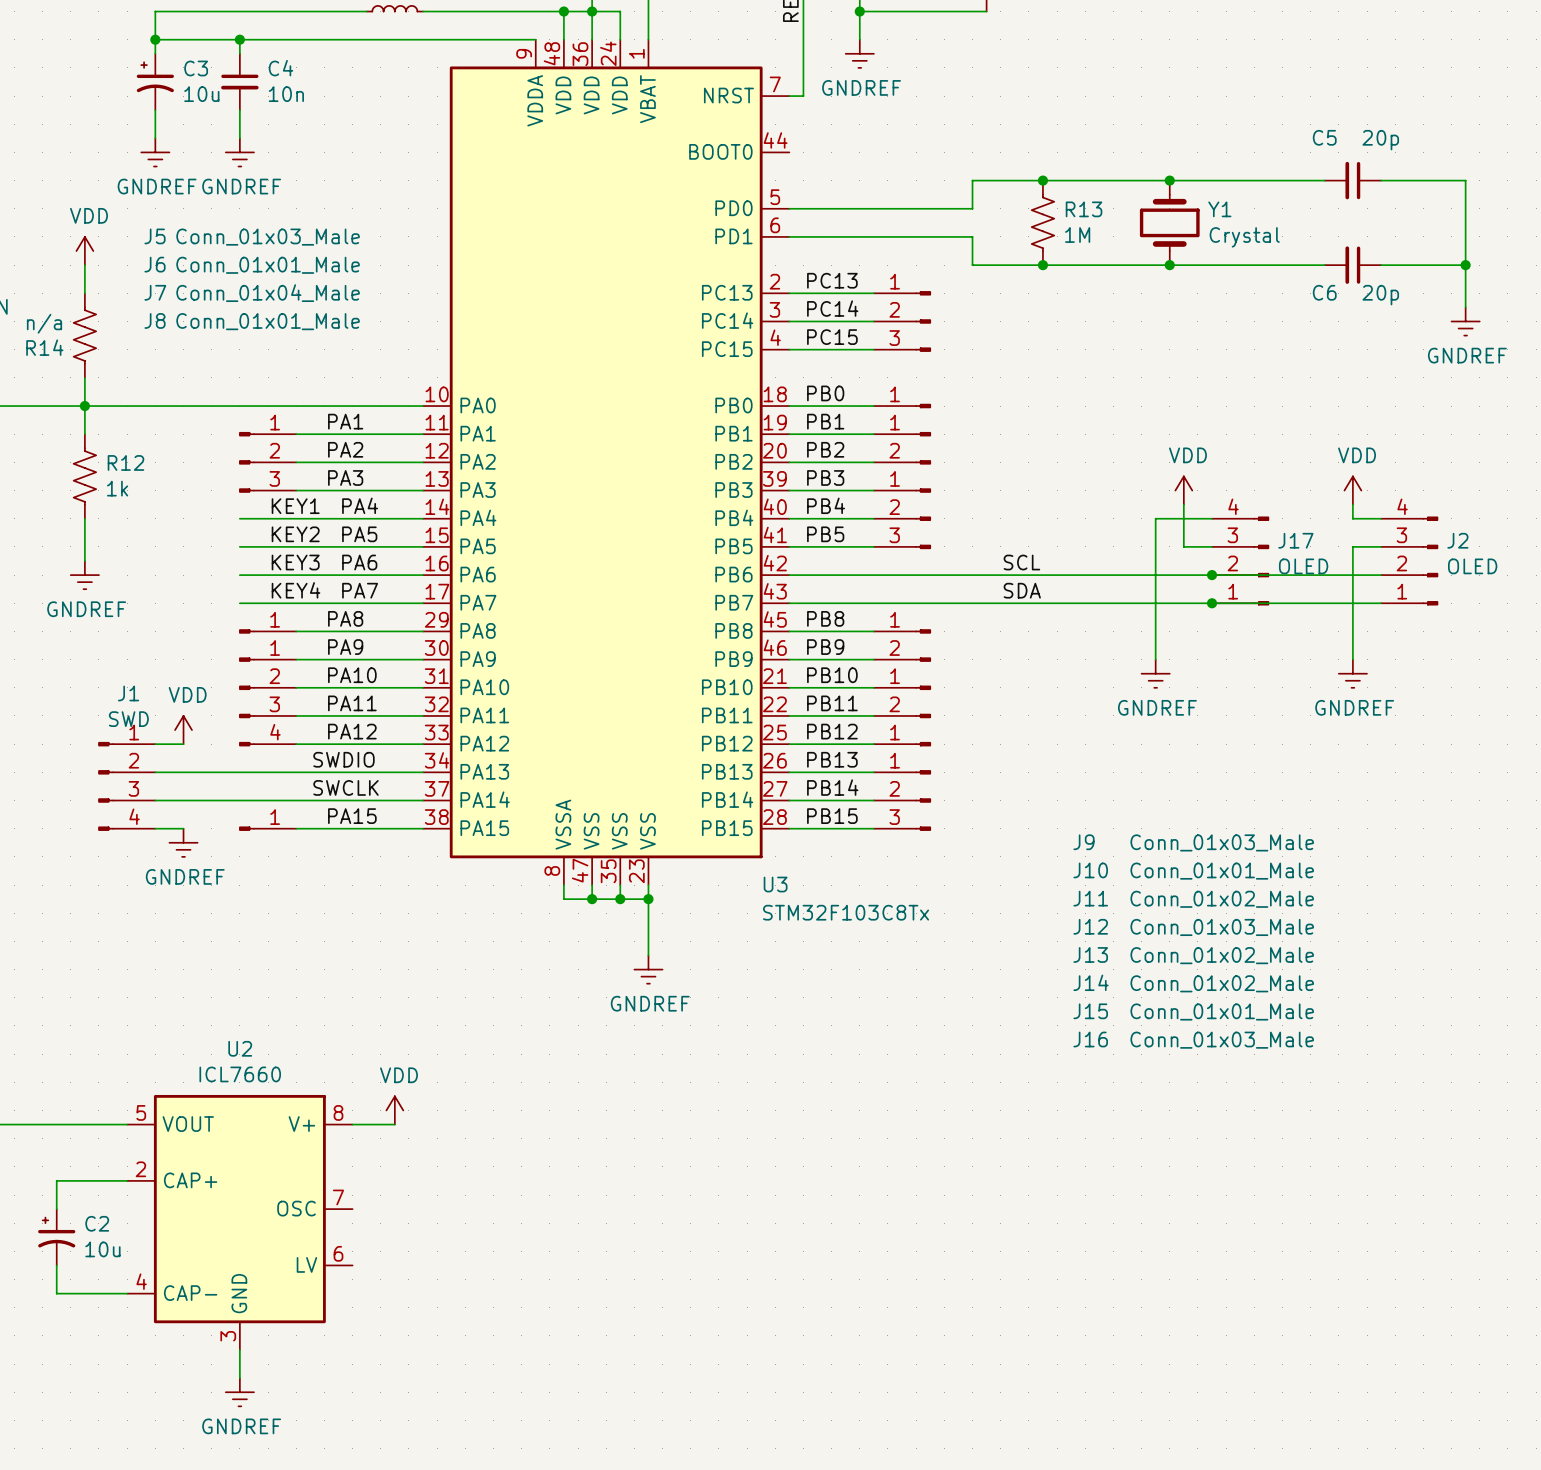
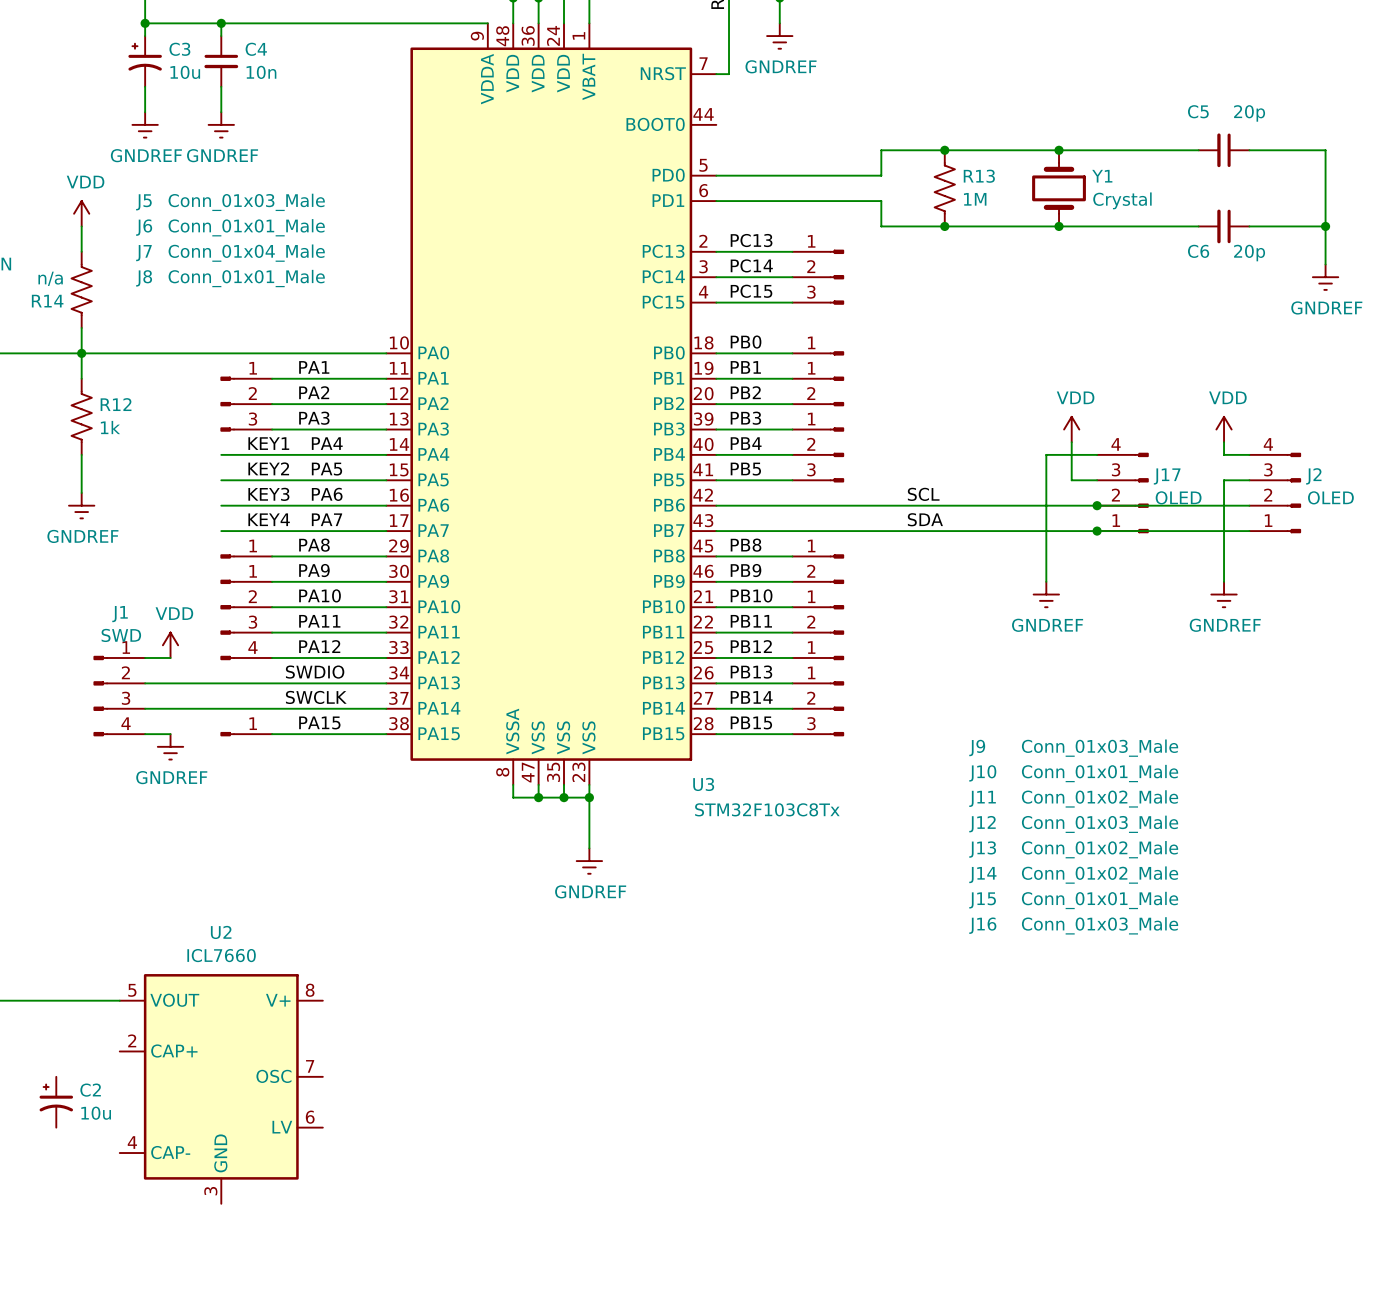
power symbol: VDD (394, 1110) -> none
wire: (352, 1124) (394, 1124) -> none
wire: (127, 1180) (56, 1180) (56, 1209) -> none
wire: (56, 1265) (56, 1293) (127, 1293) -> none
wire: (239, 1349) (239, 1378) -> none
power symbol: GNDREF (239, 1392) -> none

